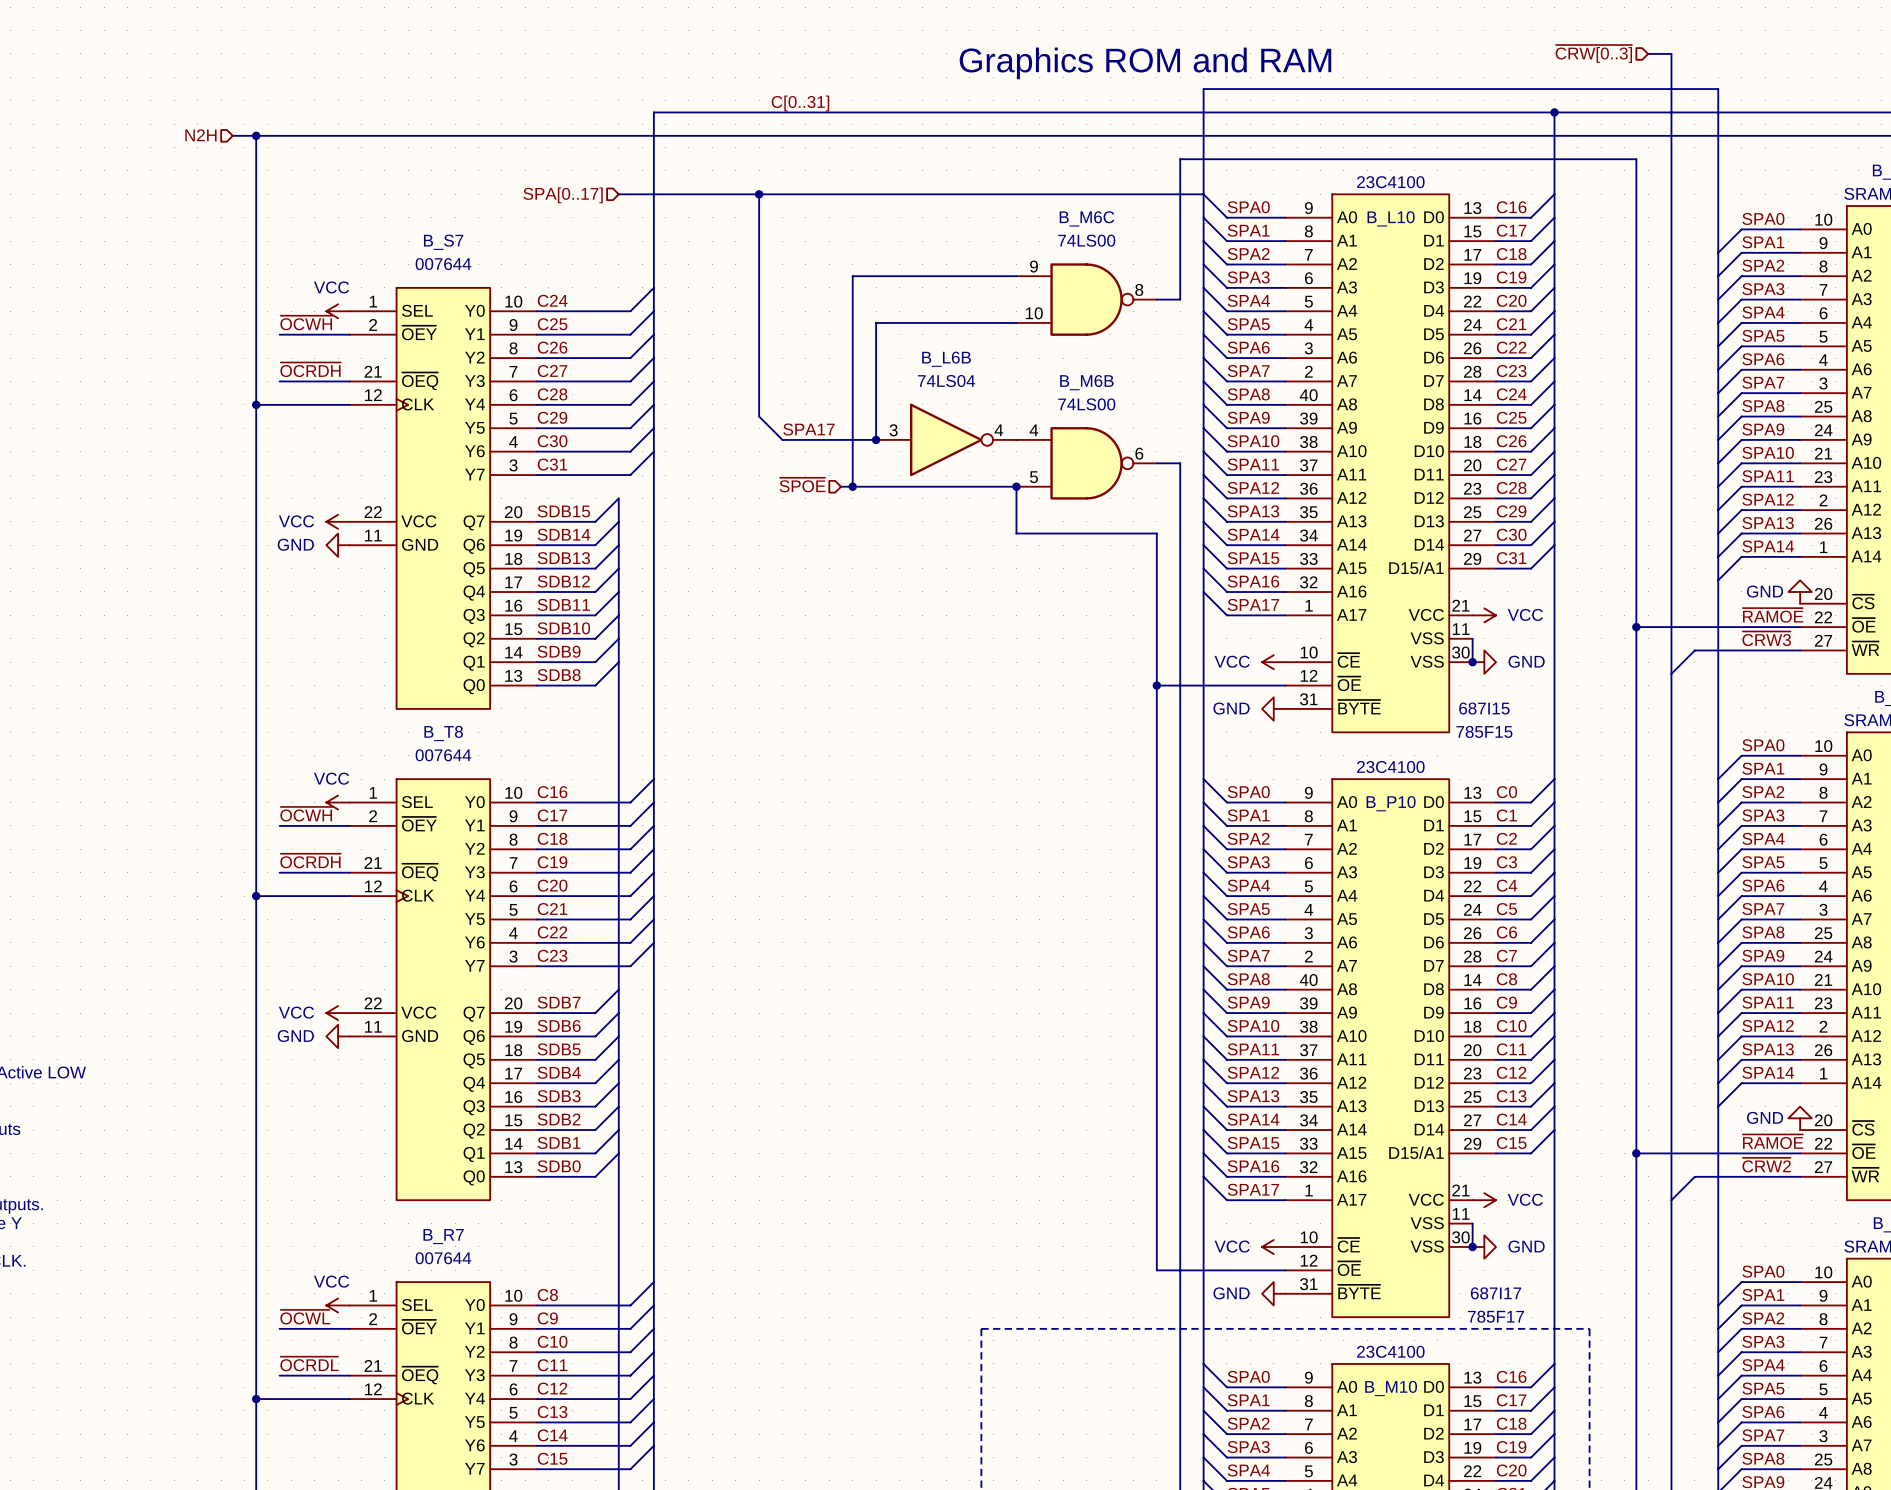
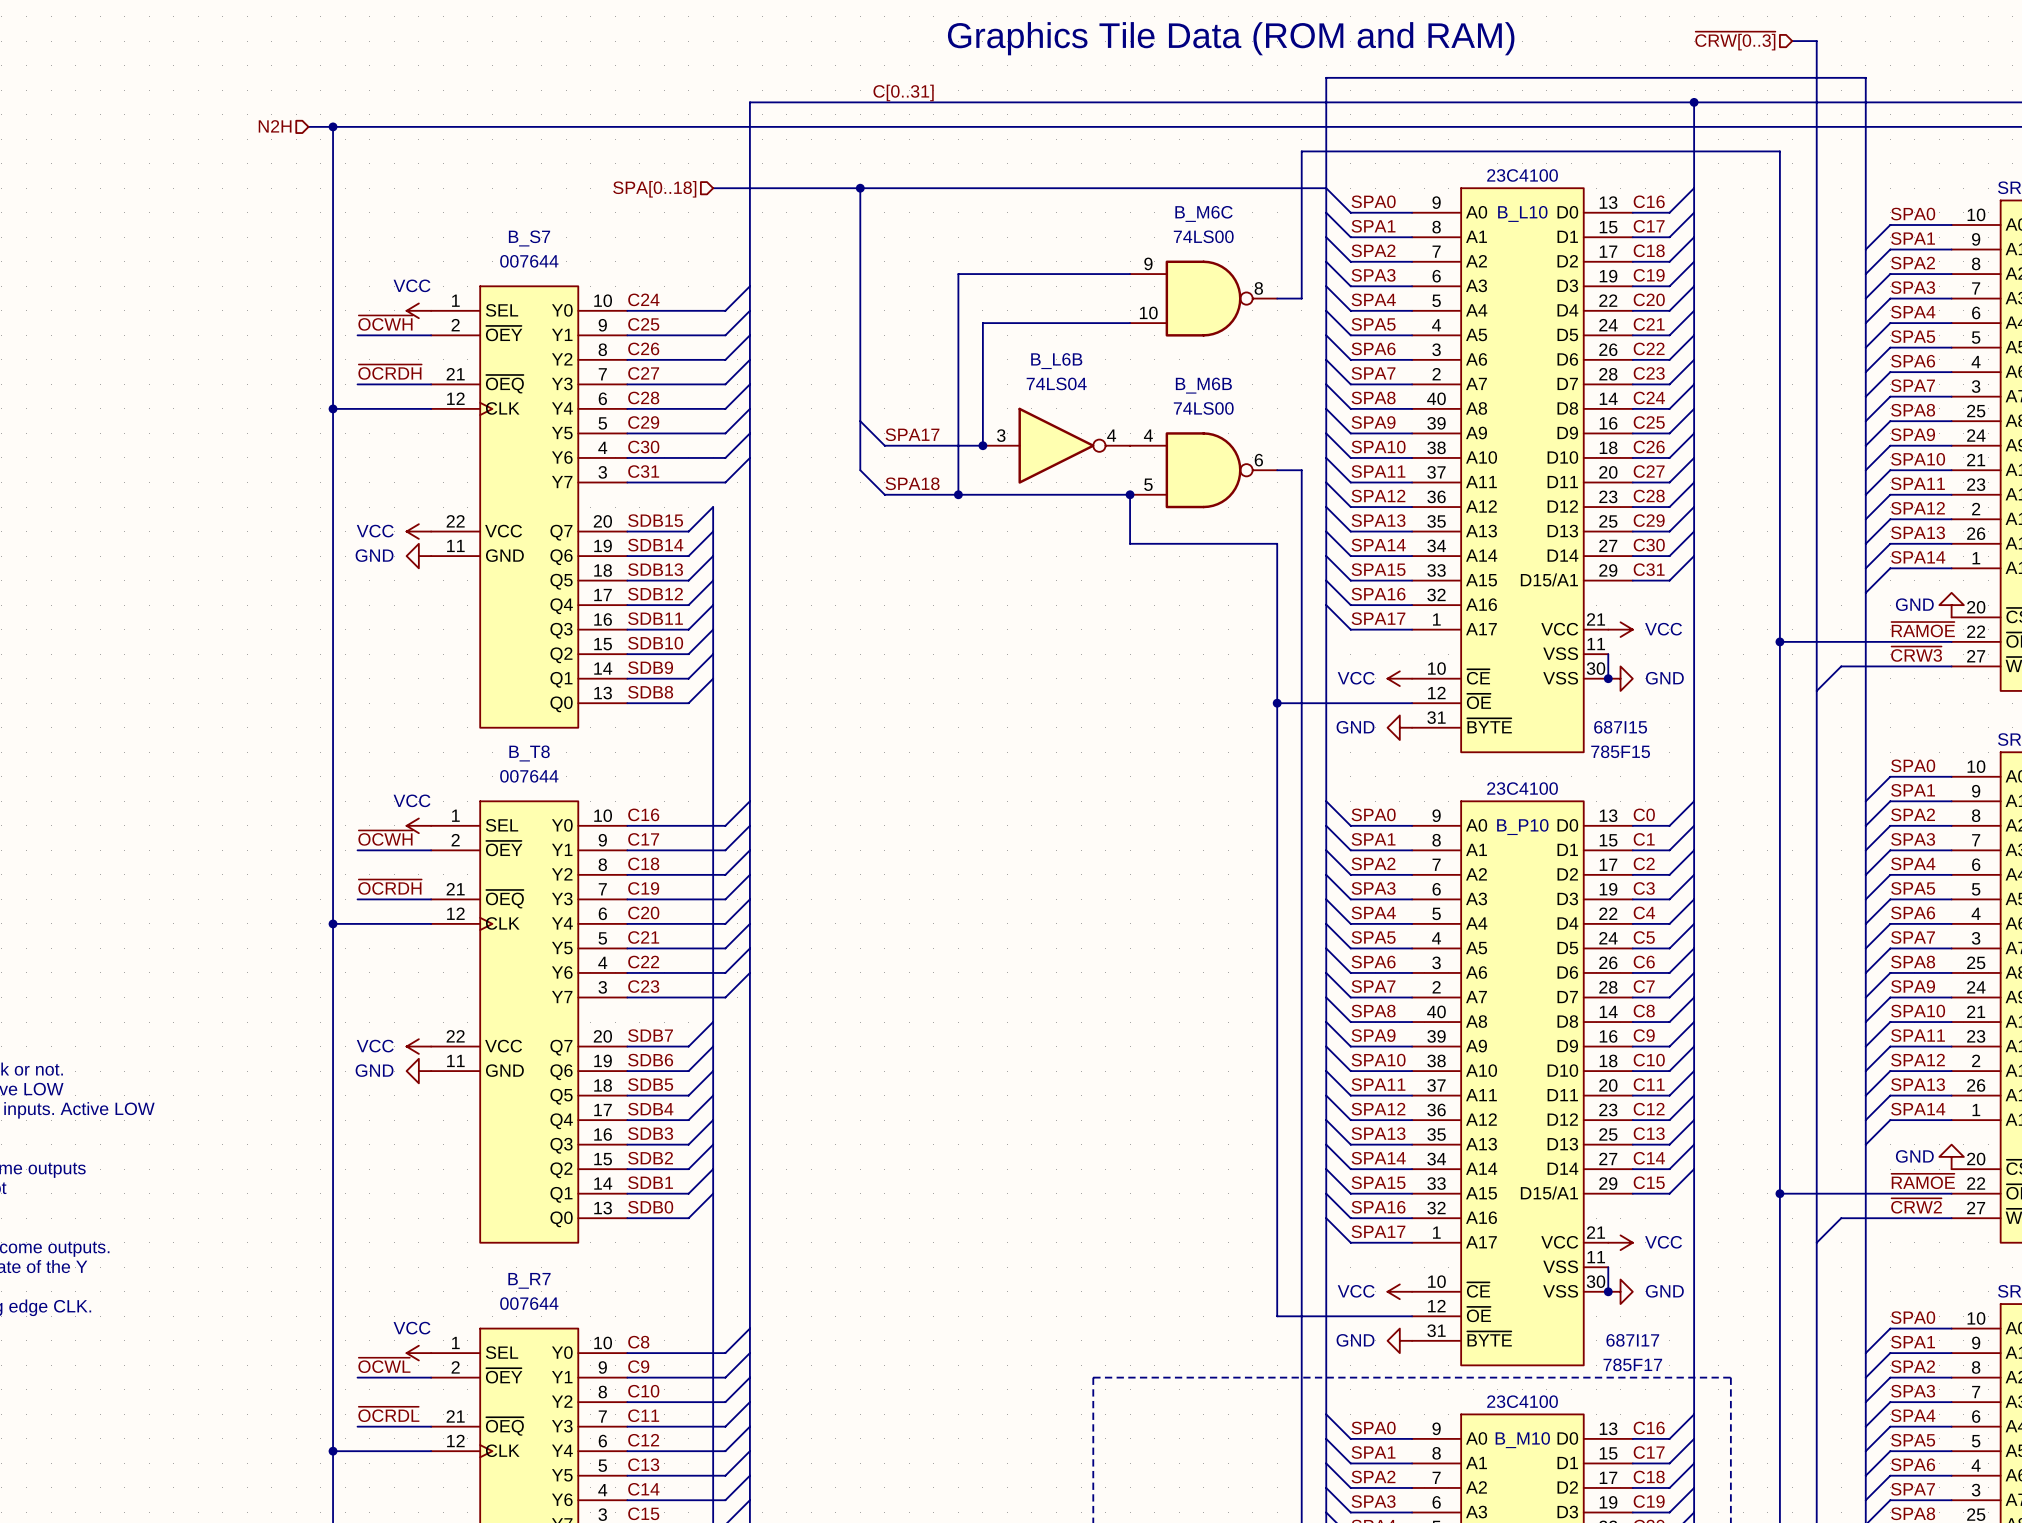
text: Graphics ROM and RAM (1145, 63) -> Graphics Tile Data (ROM and RAM) (1231, 38)
hierarchical label: SPA[0..17] (563, 195) -> SPA[0..18] (654, 189)
bus: none -> (860, 421) (860, 470)
wire: none -> (860, 470) (884, 494) (946, 494)
label: none -> SPA18 (912, 483)
hierarchical label: ~{SPOE} (802, 485) -> none

